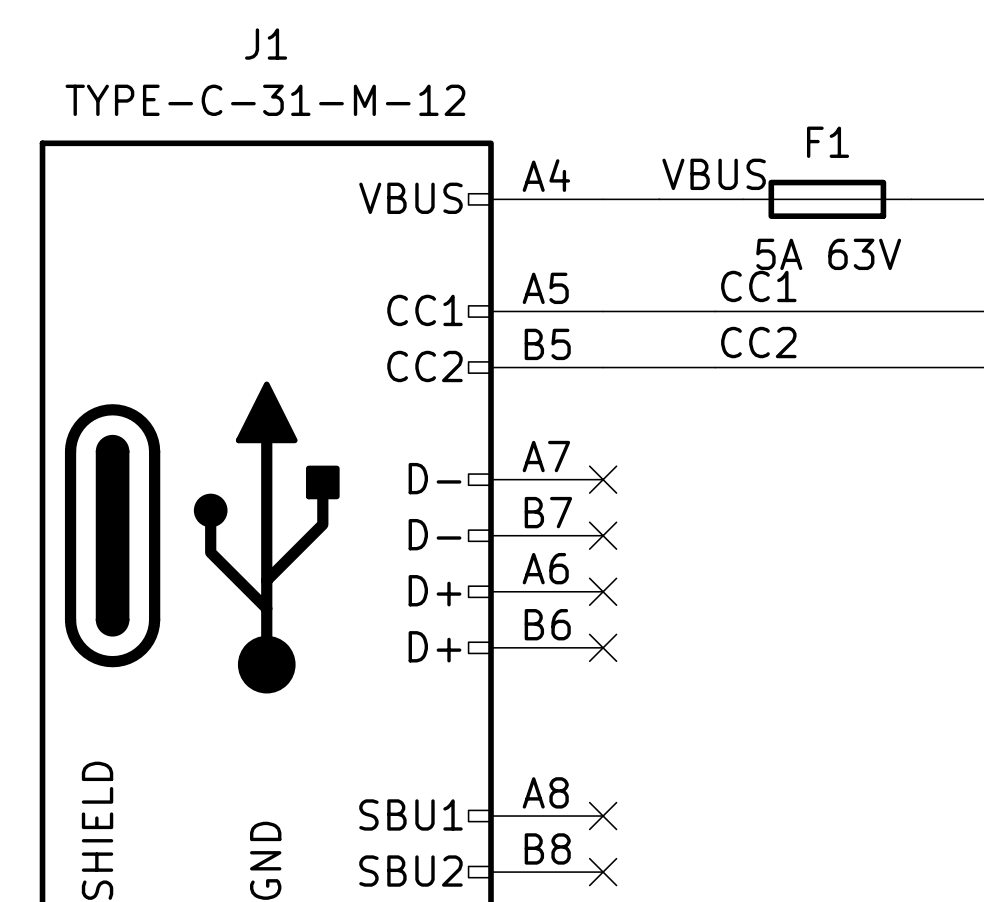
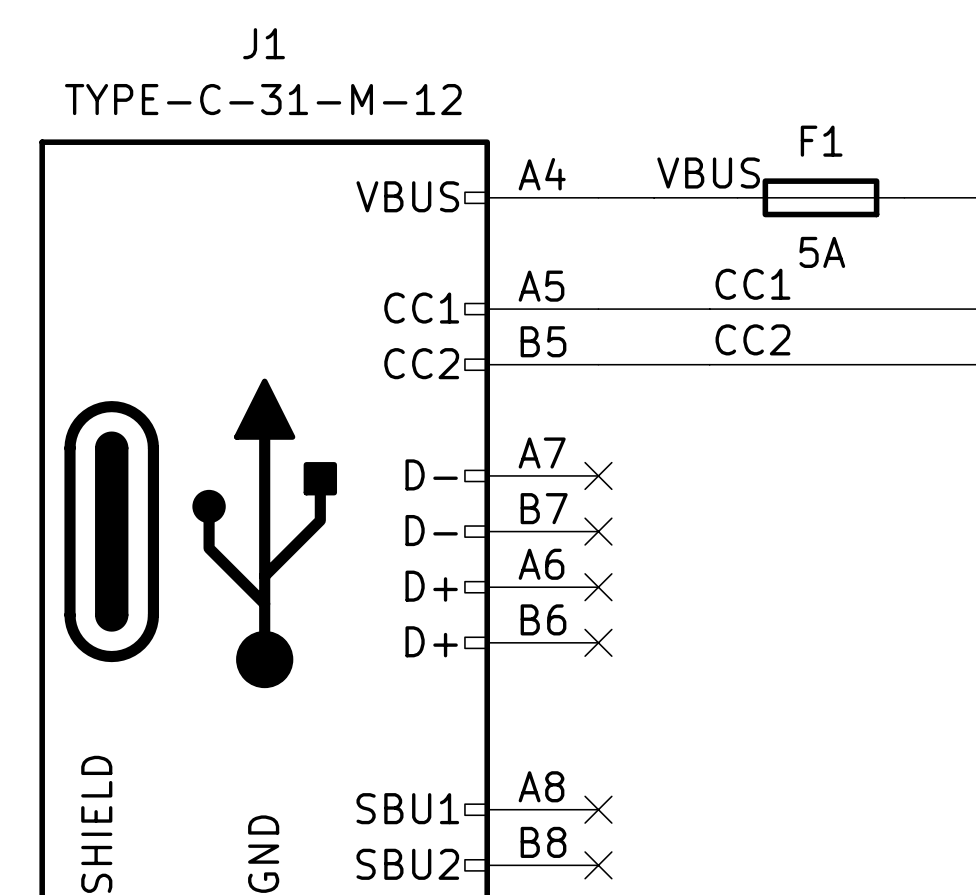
F1 value: 5A 63V (828, 254) -> 5A (822, 252)

